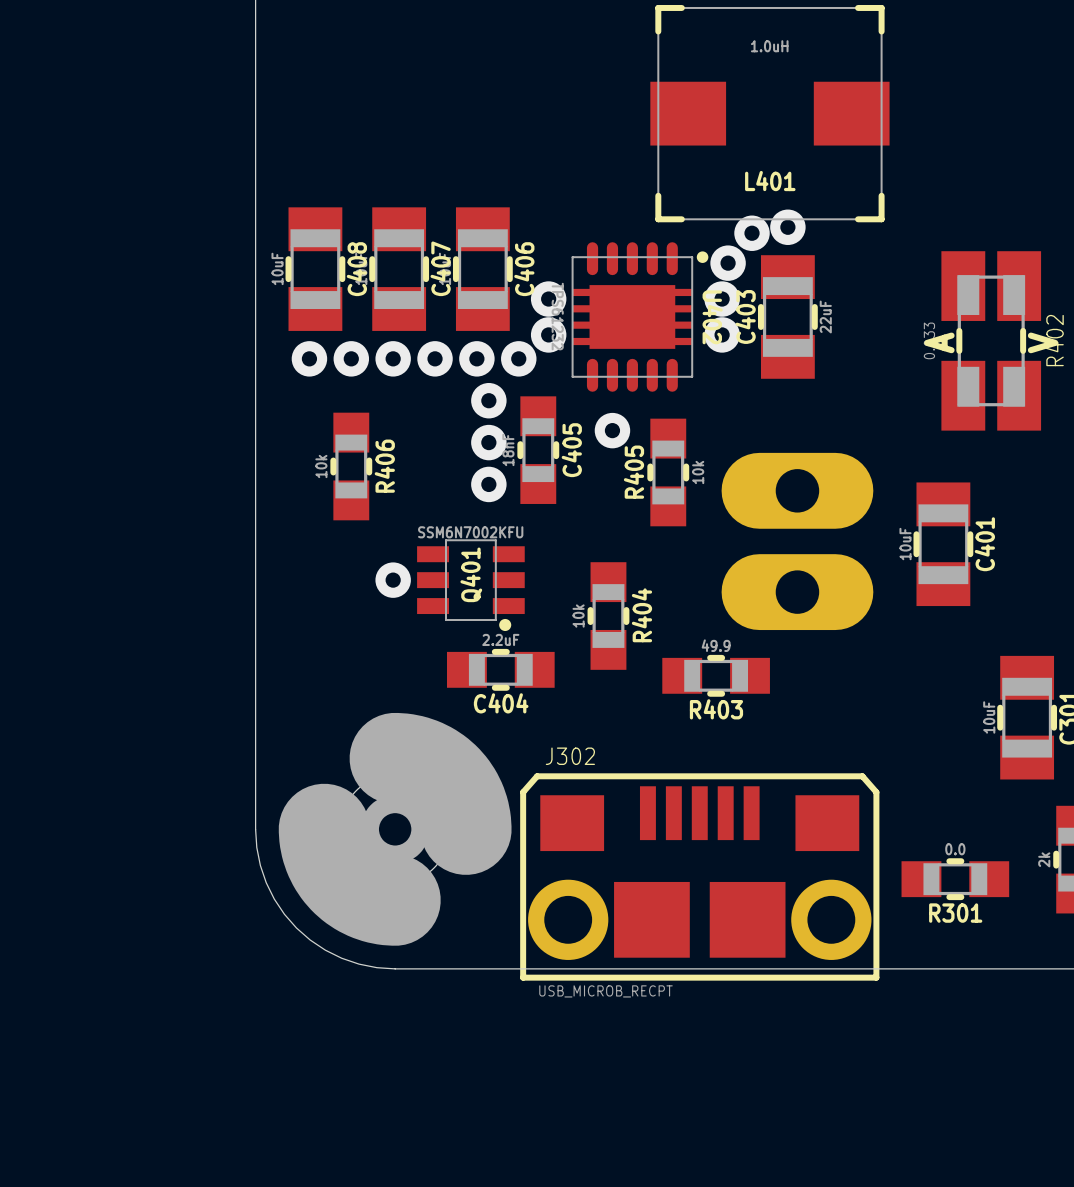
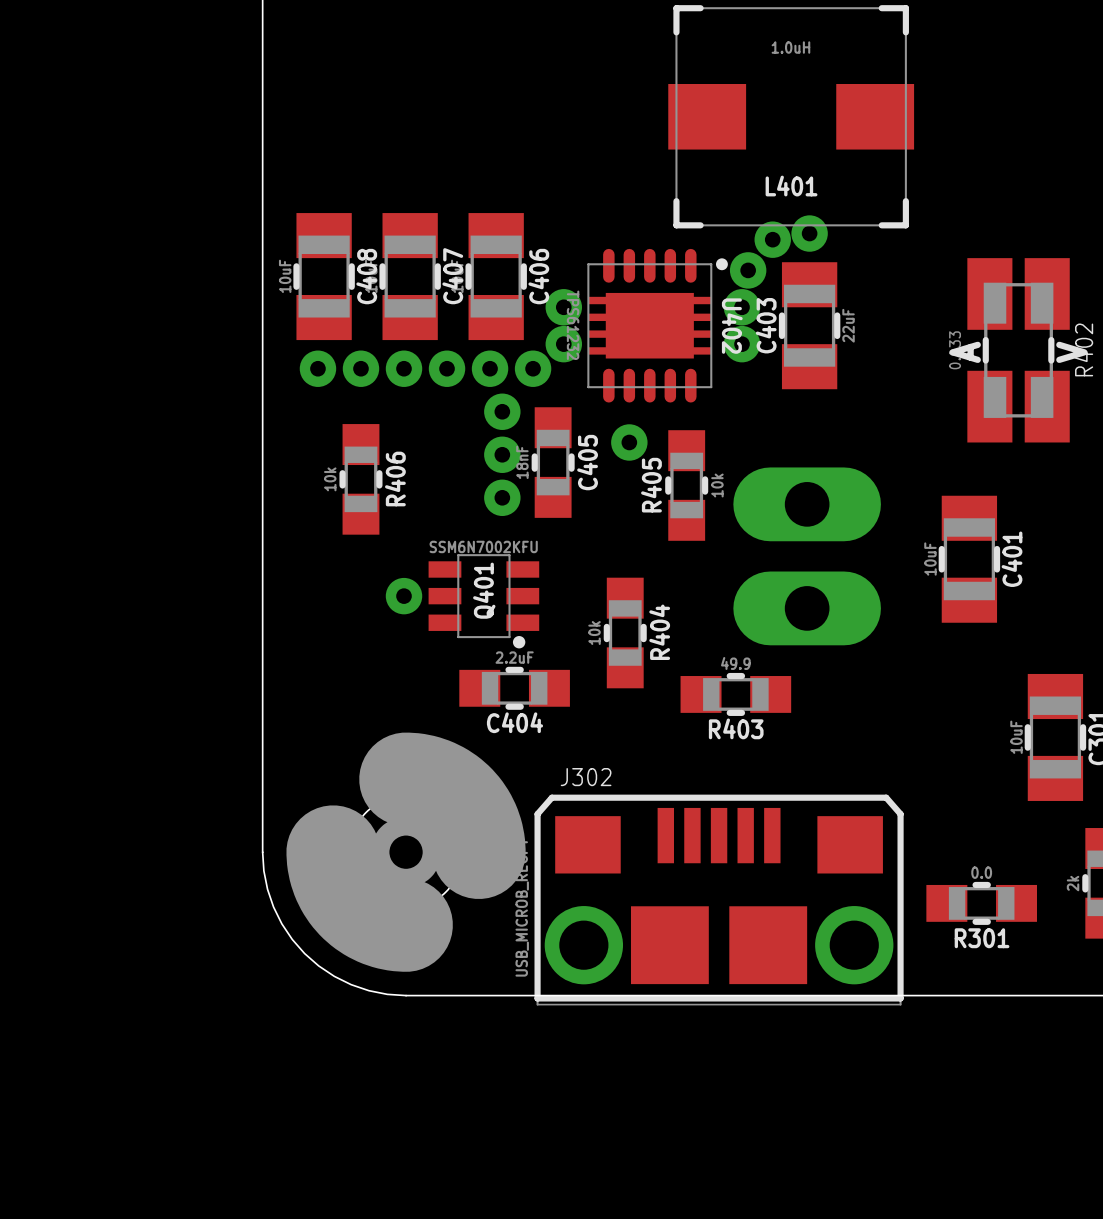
part footprint: [721, 452, 874, 631] -> [733, 467, 881, 646]
J302 footprint: [520, 773, 880, 981] -> [534, 794, 904, 1006]
J302 value rotation: 0° (605, 991) -> 90° counterclockwise (522, 907)
J302 value position: USB_MICROB_RECPT (605, 991) -> USB_MICROB_RECPT (522, 907)

